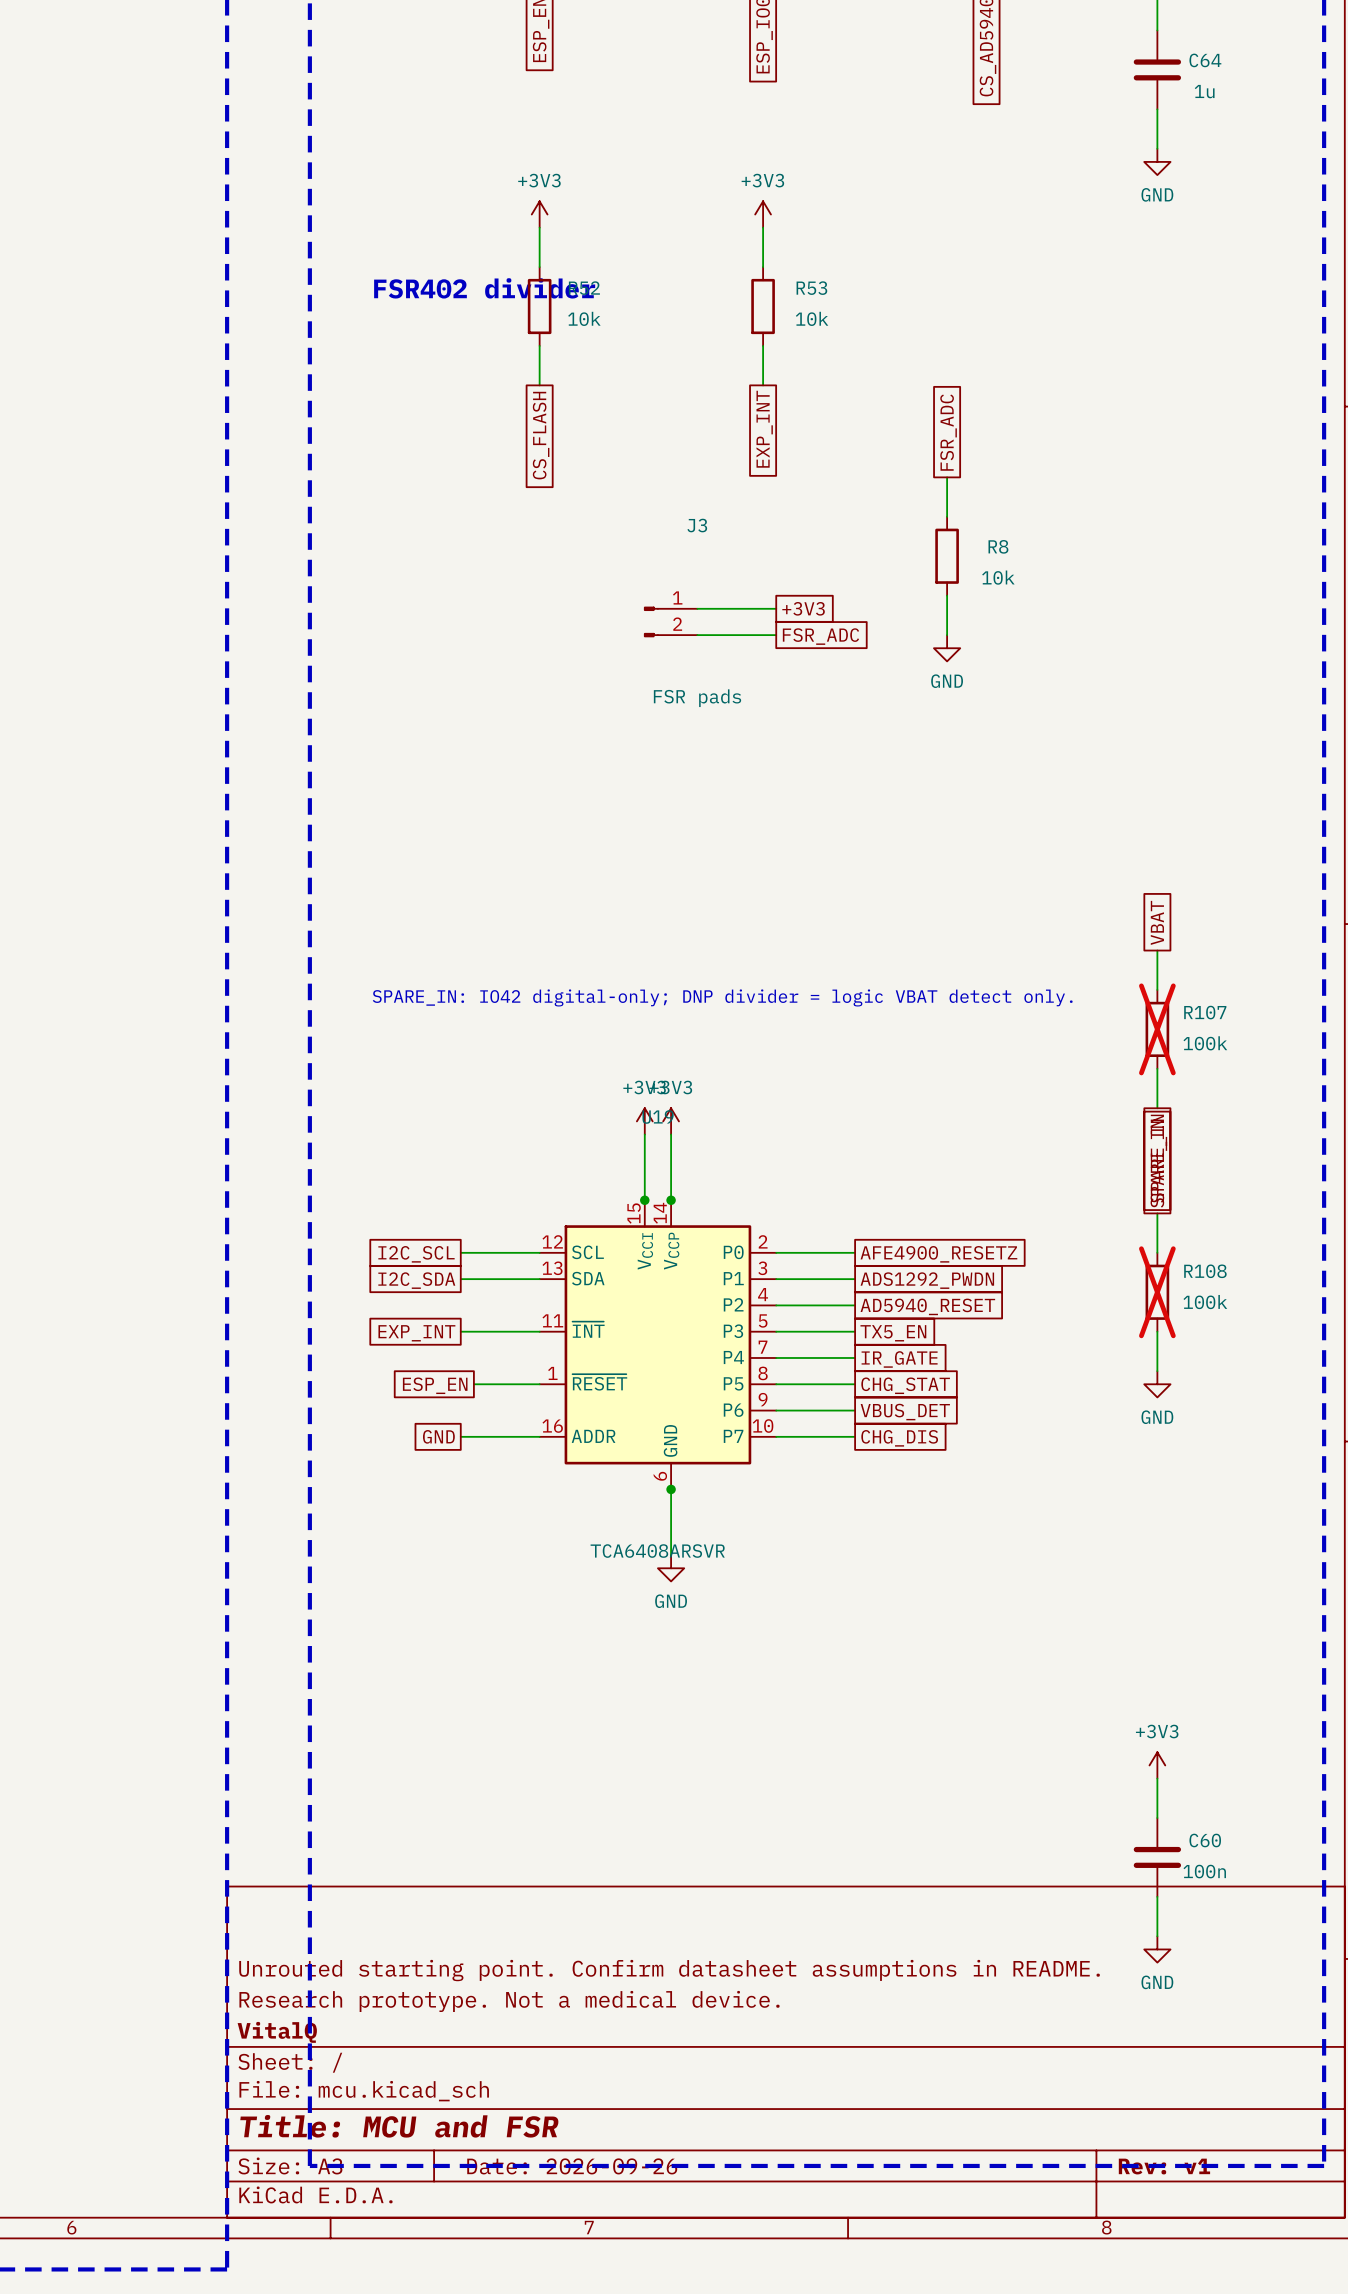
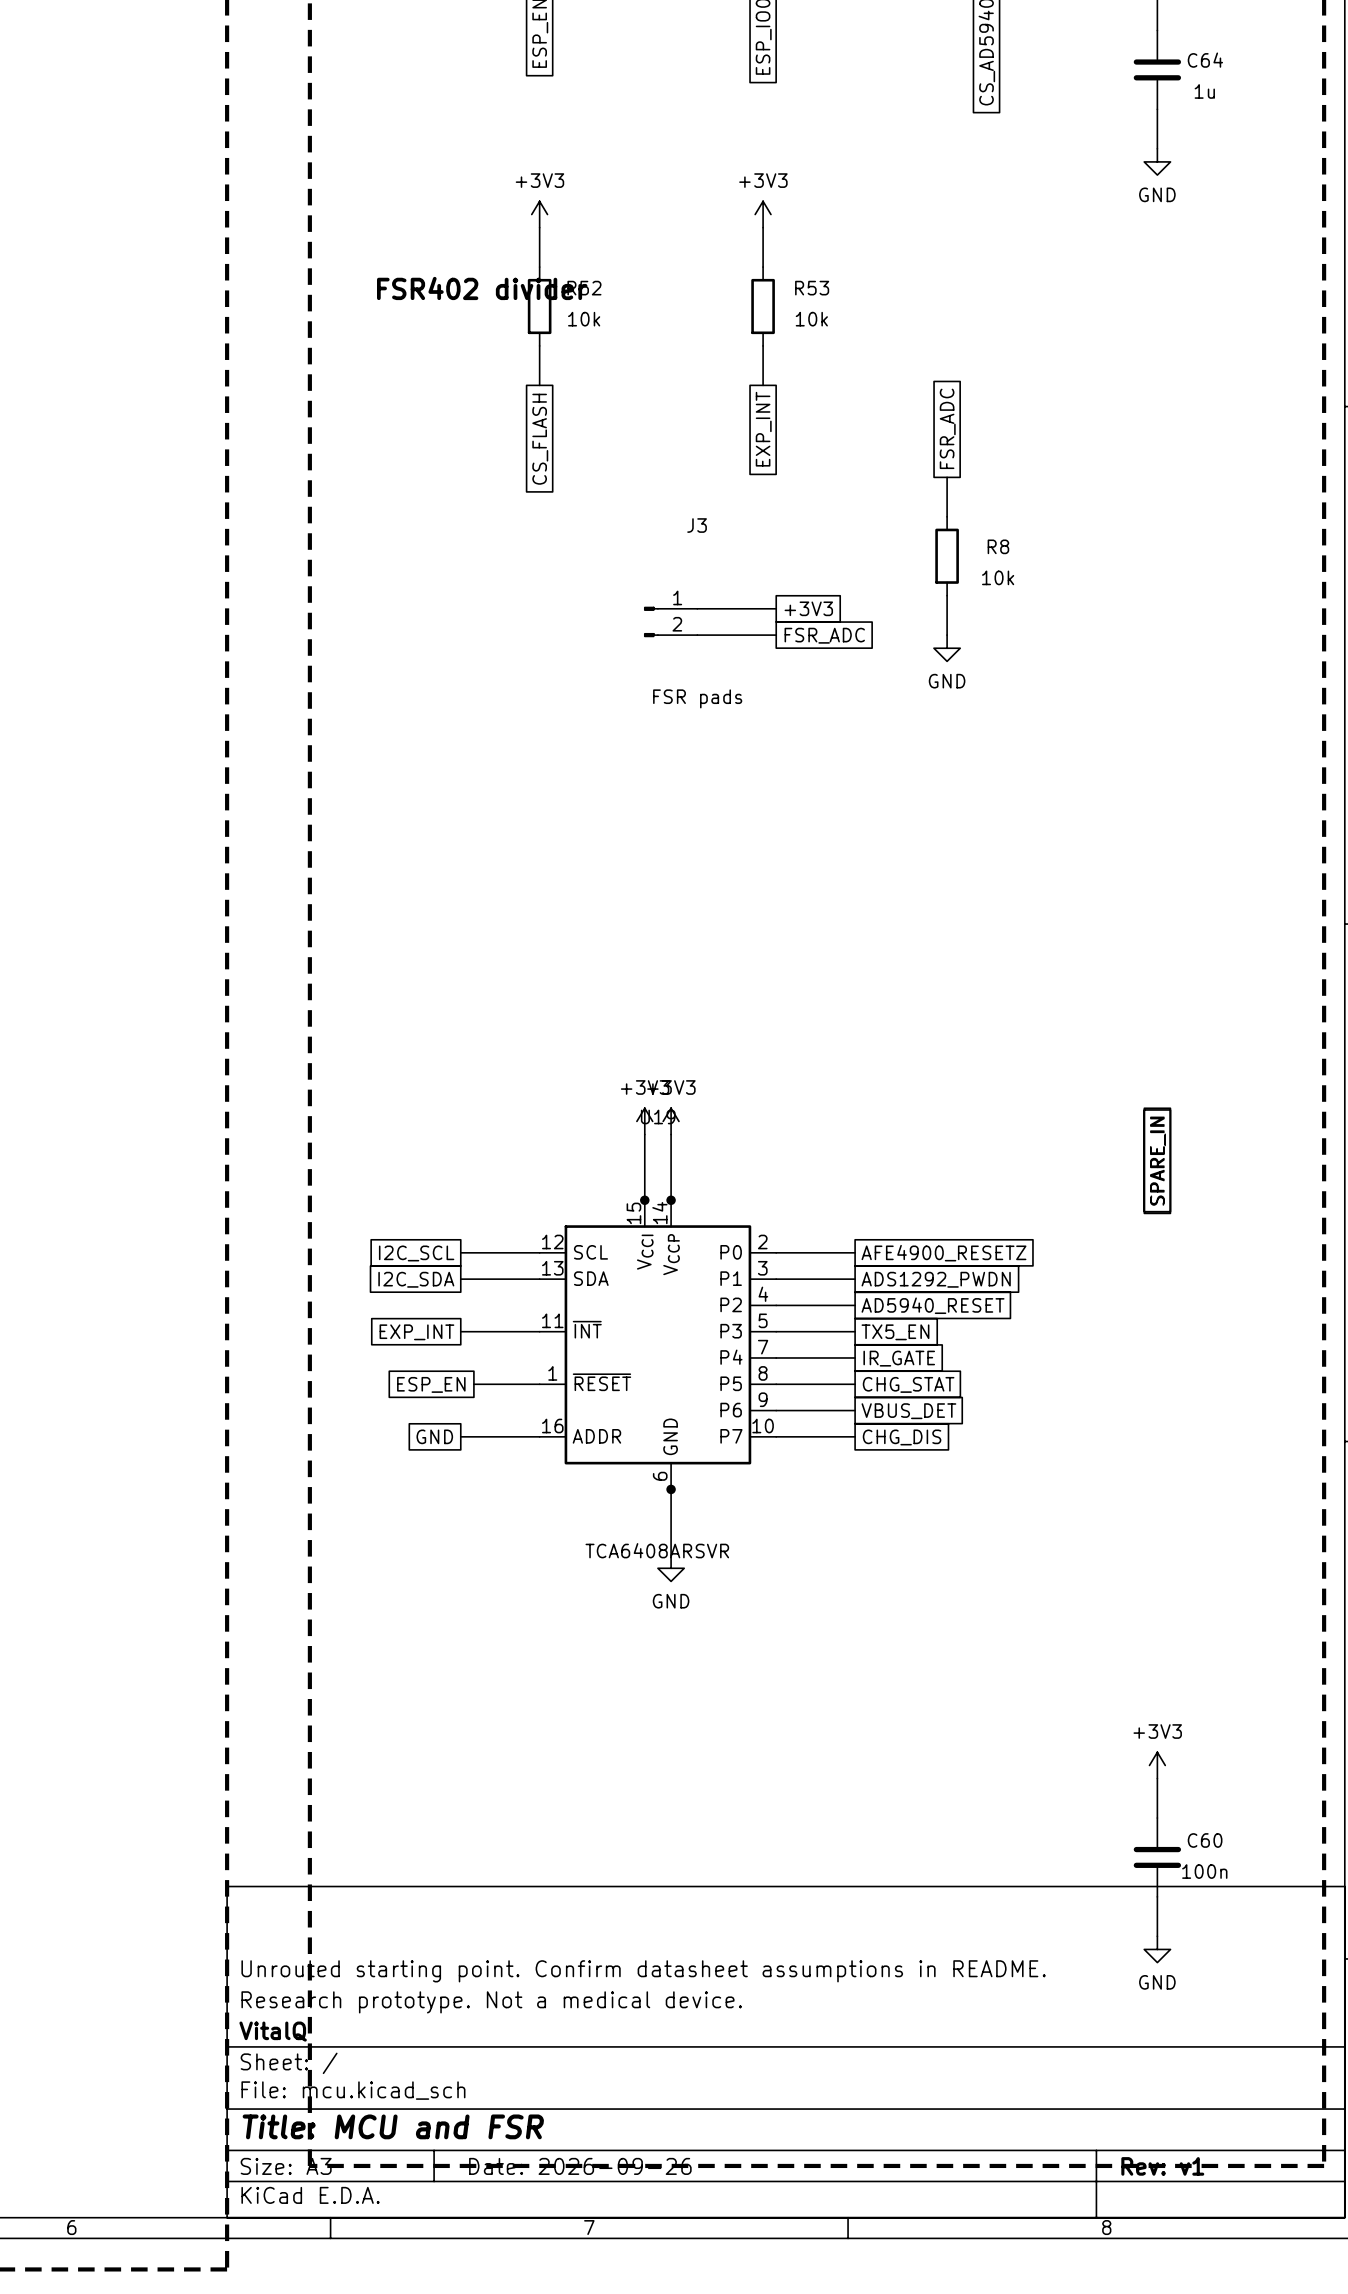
global label: VBAT (1157, 922) -> none
wire: (1157, 950) (1157, 989) -> none
text: SPARE_IN: IO42 digital-only; DNP divider = logic VBAT detect only. (722, 997) -> none
R107: 100k (1157, 1029) -> none
wire: (1157, 1068) (1157, 1108) -> none
wire: (1157, 1213) (1157, 1252) -> none
R108: 100k (1157, 1292) -> none
wire: (1157, 1331) (1157, 1371) -> none
power symbol: GND (1157, 1384) -> none

